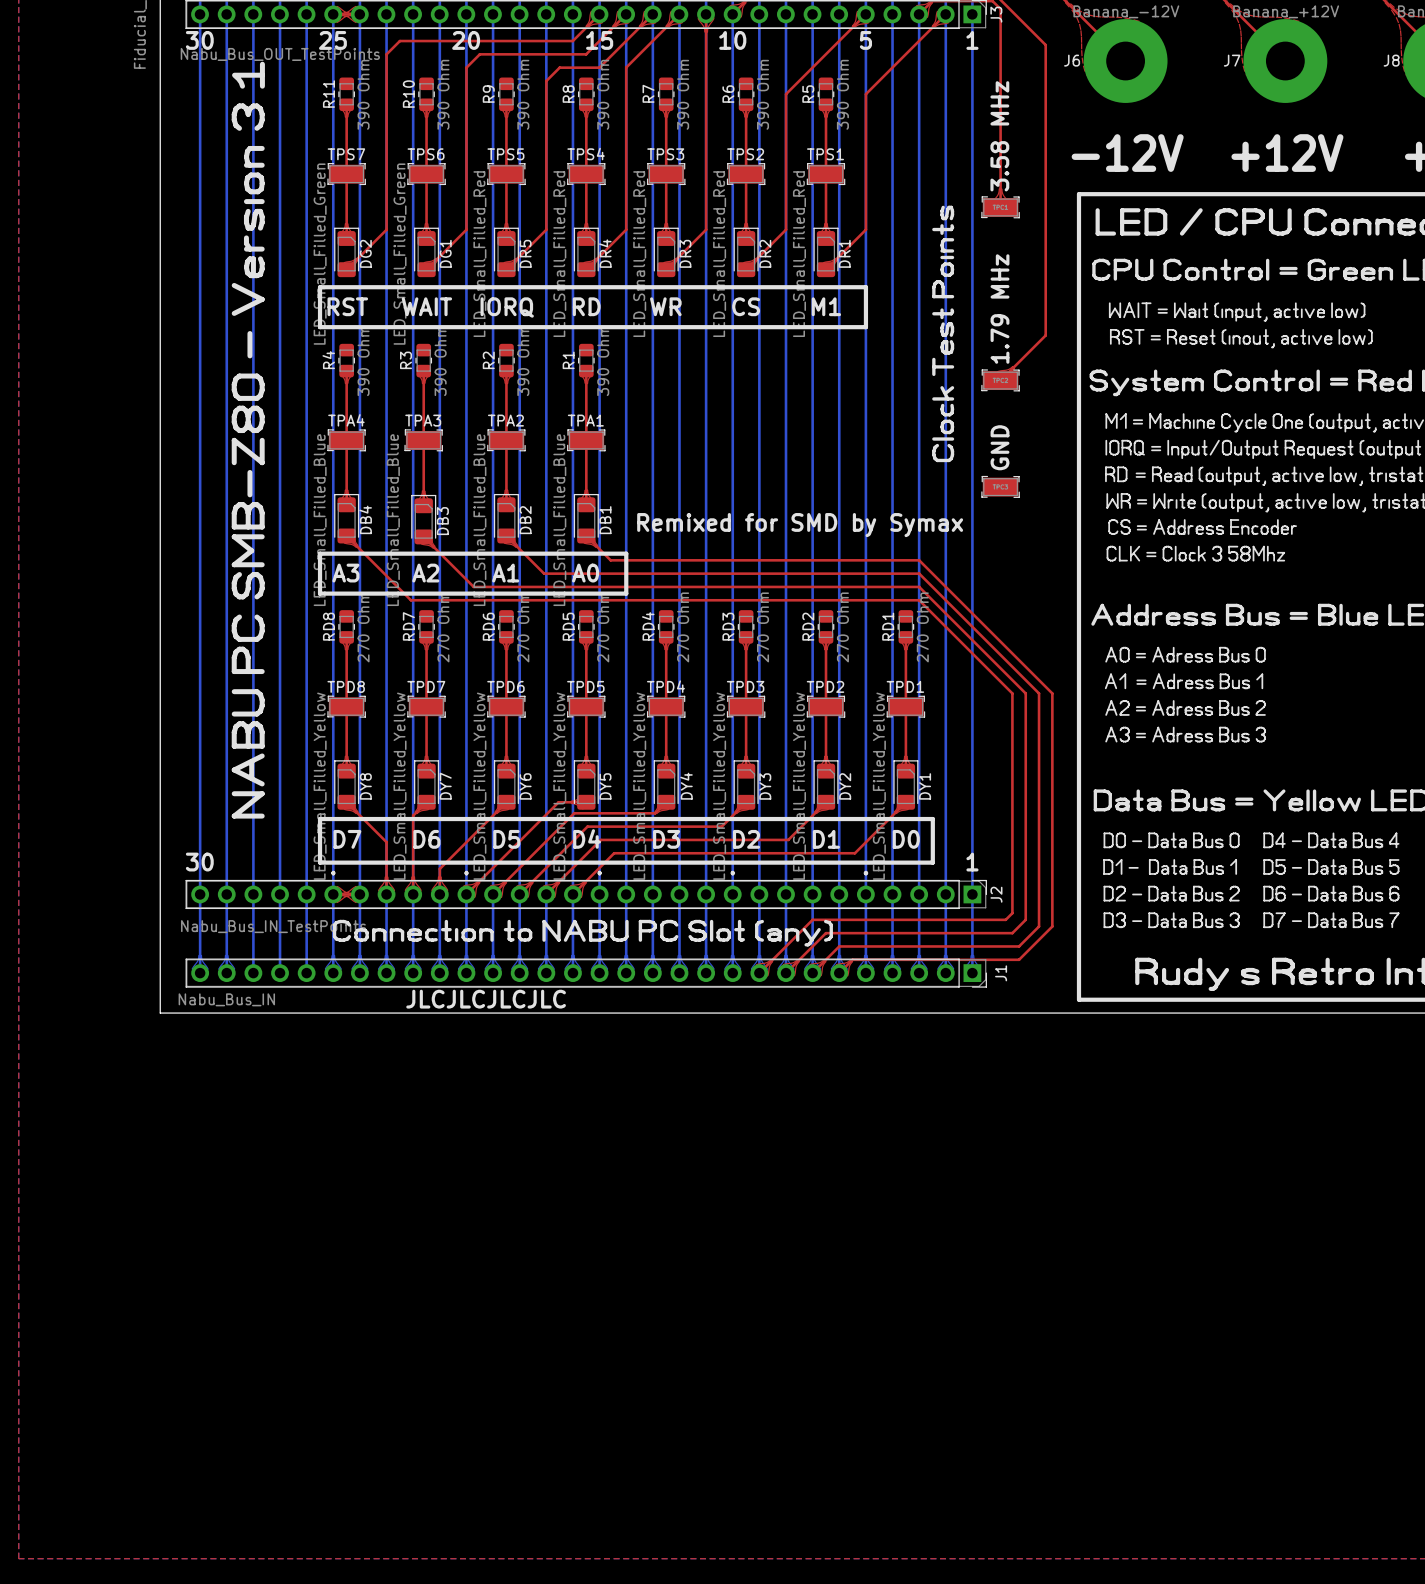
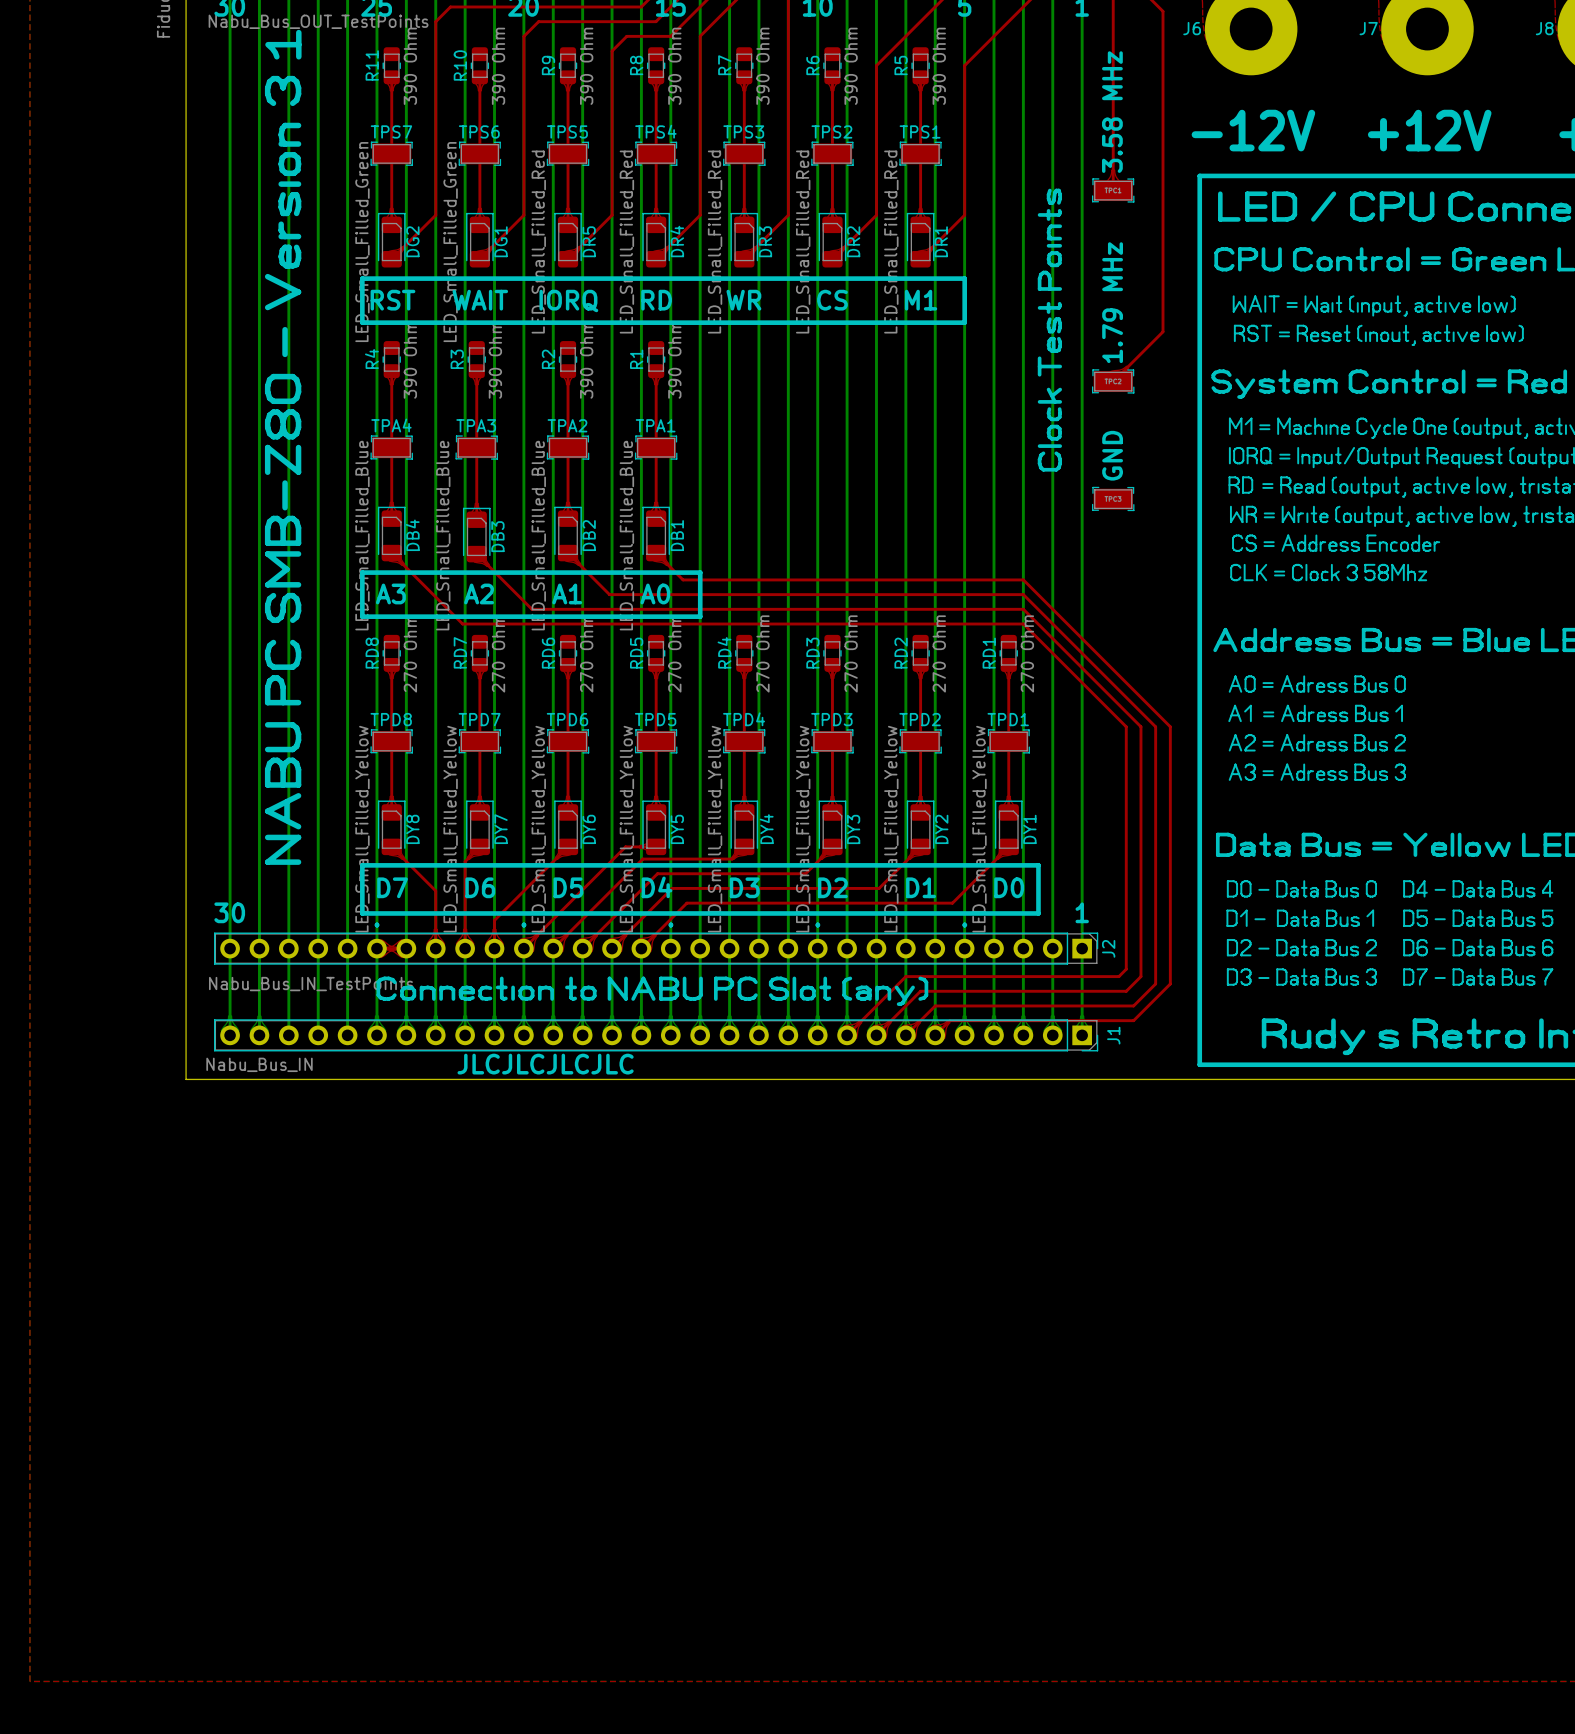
text: Remixed for SMD by Symax (800, 525) -> none

